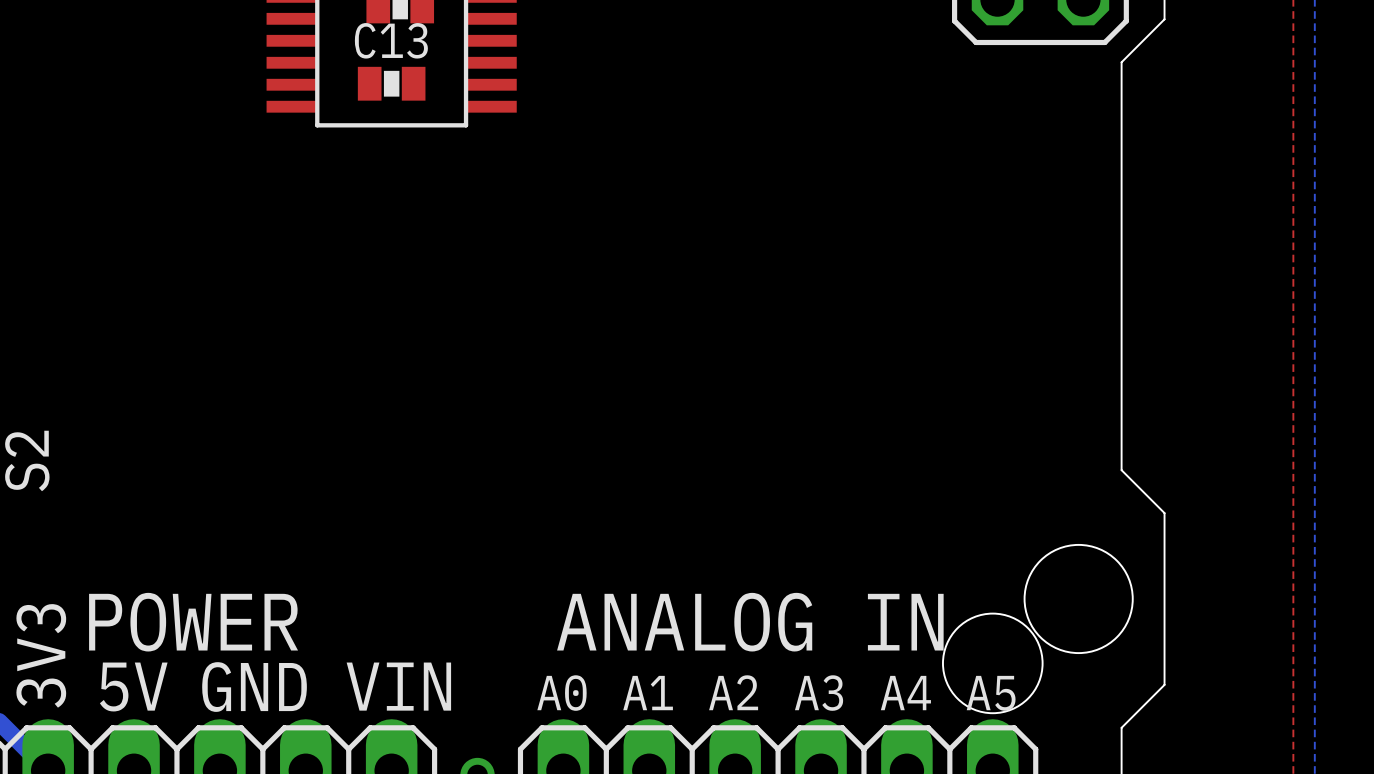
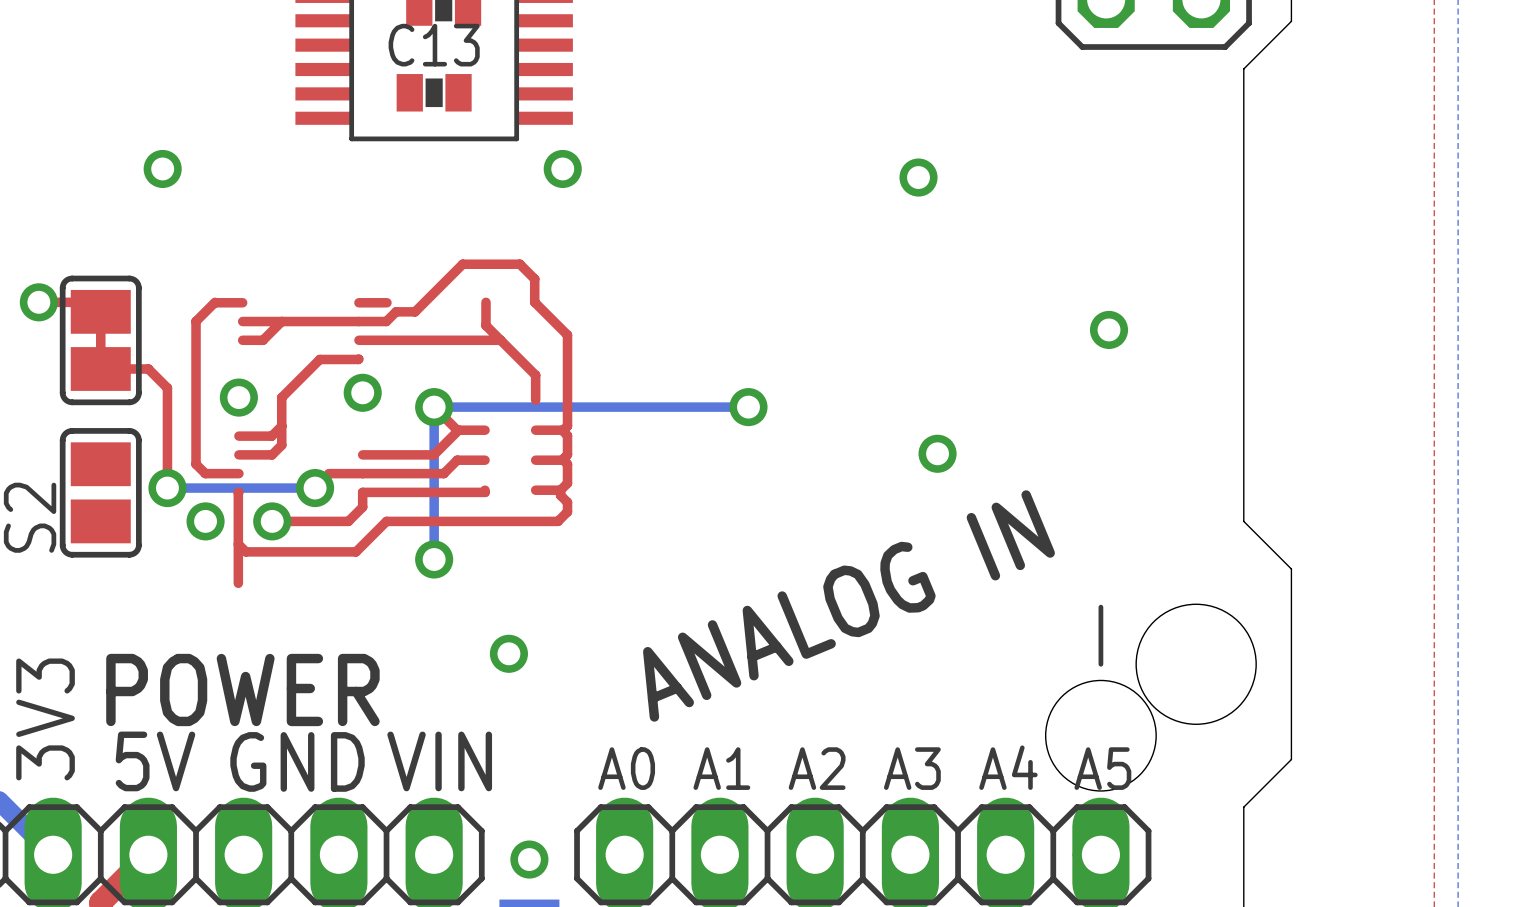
via: none -> (162, 168)
via: none -> (562, 168)
via: none -> (918, 177)
top track: none -> (38, 302) (91, 302) (100, 311) (100, 369) (148, 369) (167, 388) (167, 488)
via: none -> (38, 302)
top track: none -> (215, 302) (196, 321) (196, 464) (205, 473) (238, 473)
top track: none -> (485, 302) (485, 325) (535, 375) (535, 400)
top track: none -> (215, 302) (242, 302)
top track: none -> (358, 302) (386, 302)
top track: none -> (242, 321) (386, 321) (396, 311) (415, 311) (462, 264) (519, 264) (534, 279) (534, 302) (567, 335) (567, 426) (563, 430) (535, 430)
top track: none -> (281, 321) (263, 340) (242, 340)
via: none -> (1109, 329)
top track: none -> (358, 340) (500, 340)
part: none -> (100, 340)
top track: none -> (358, 359) (319, 359) (281, 397) (281, 445) (272, 454) (238, 454)
via: none -> (362, 392)
via: none -> (238, 397)
top track: none -> (434, 407) (457, 430) (485, 430)
via: none -> (434, 407)
bottom track: none -> (748, 407) (434, 407) (434, 559)
via: none -> (748, 407)
top track: none -> (281, 426) (271, 436) (238, 436)
top track: none -> (458, 430) (434, 454) (362, 454)
top track: none -> (562, 430) (567, 435) (567, 454) (563, 460)
via: none -> (937, 453)
top track: none -> (485, 460) (457, 460) (443, 473) (329, 473) (315, 488)
top track: none -> (535, 460) (563, 460)
top track: none -> (563, 460) (567, 464) (567, 483) (560, 490)
bottom track: none -> (167, 488) (315, 488)
via: none -> (167, 488)
via: none -> (315, 488)
top track: none -> (485, 490) (485, 492) (362, 492) (362, 507) (348, 521) (272, 521)
top track: none -> (535, 490) (560, 490)
top track: none -> (560, 490) (560, 495) (567, 502) (567, 511) (557, 521) (386, 521) (356, 551) (245, 551) (238, 544)
part: none -> (100, 492)
top track: none -> (238, 492) (238, 583)
via: none -> (205, 521)
via: none -> (272, 521)
via: none -> (434, 559)
line: none -> (1100, 607) (1100, 664)
via: none -> (508, 653)
text rotation: 0° (750, 622) -> 22.5° counterclockwise (848, 605)

